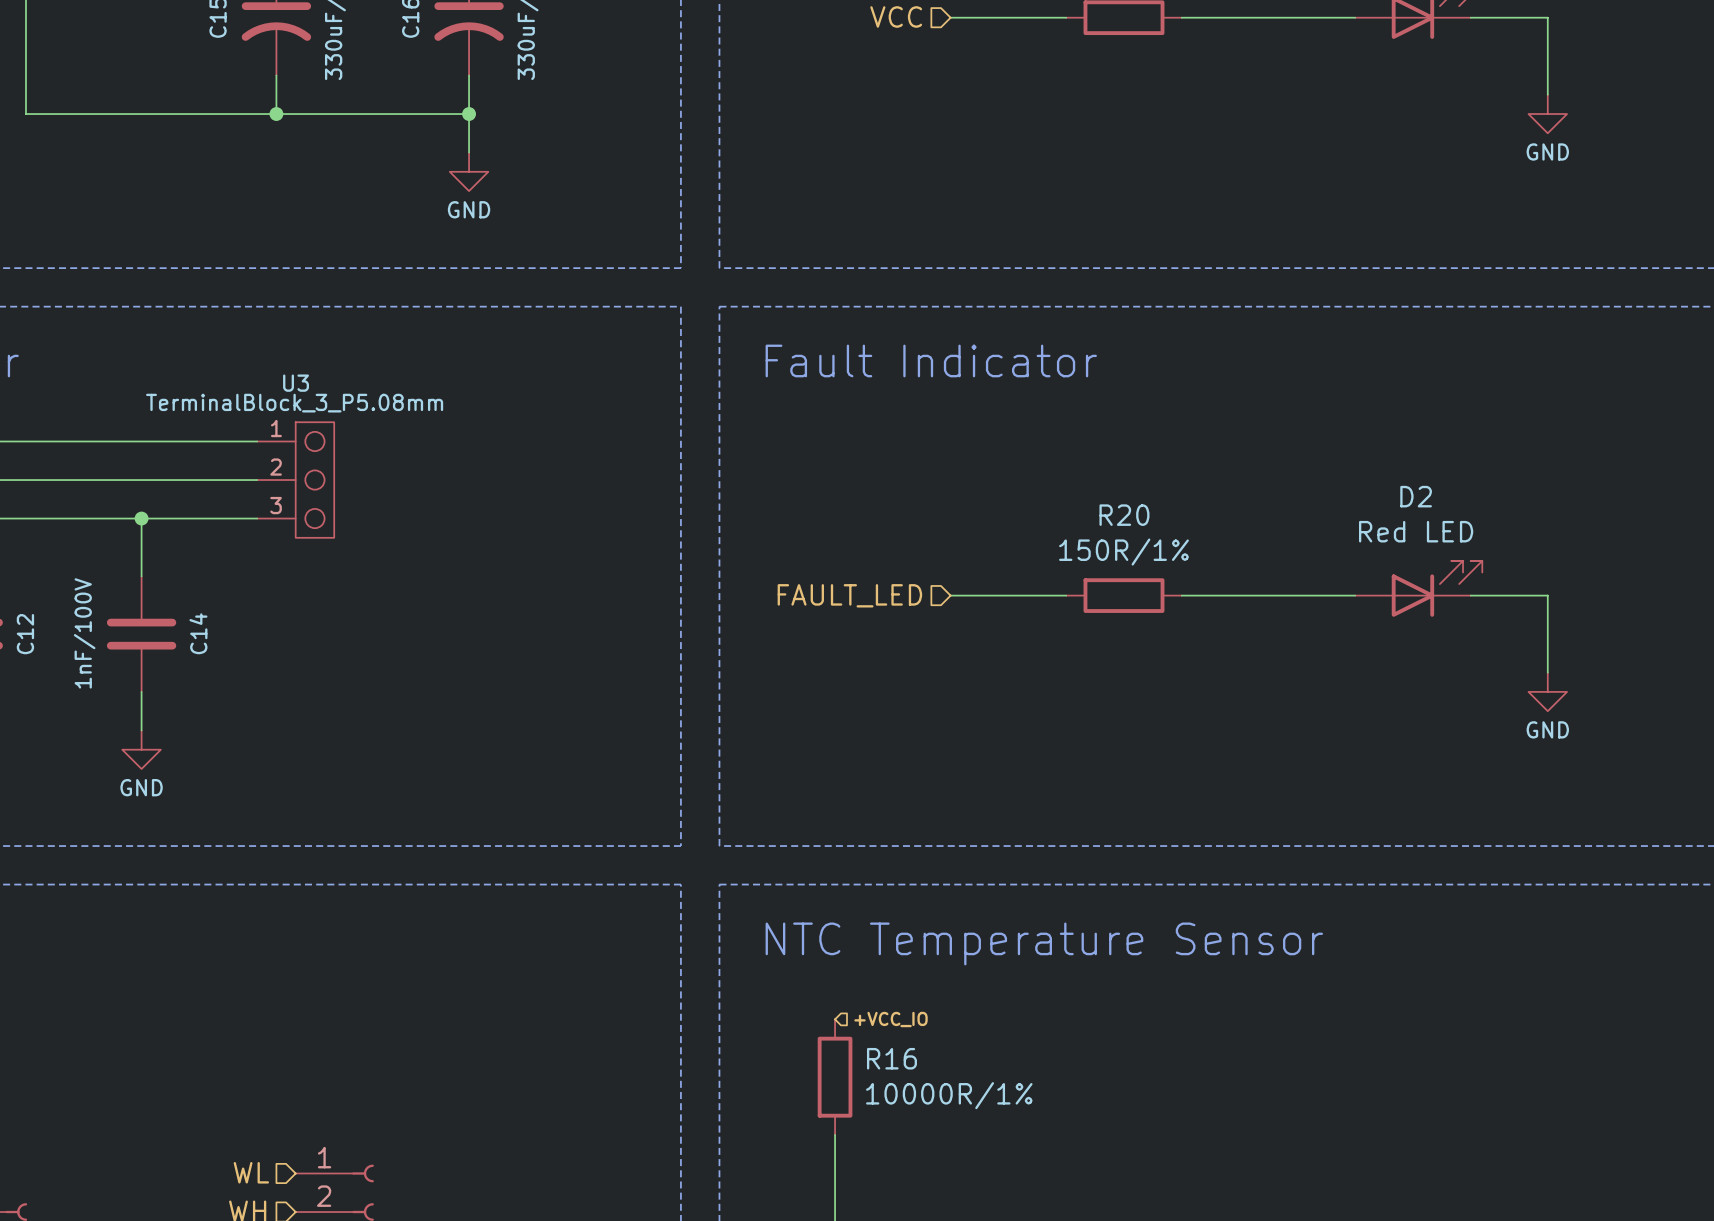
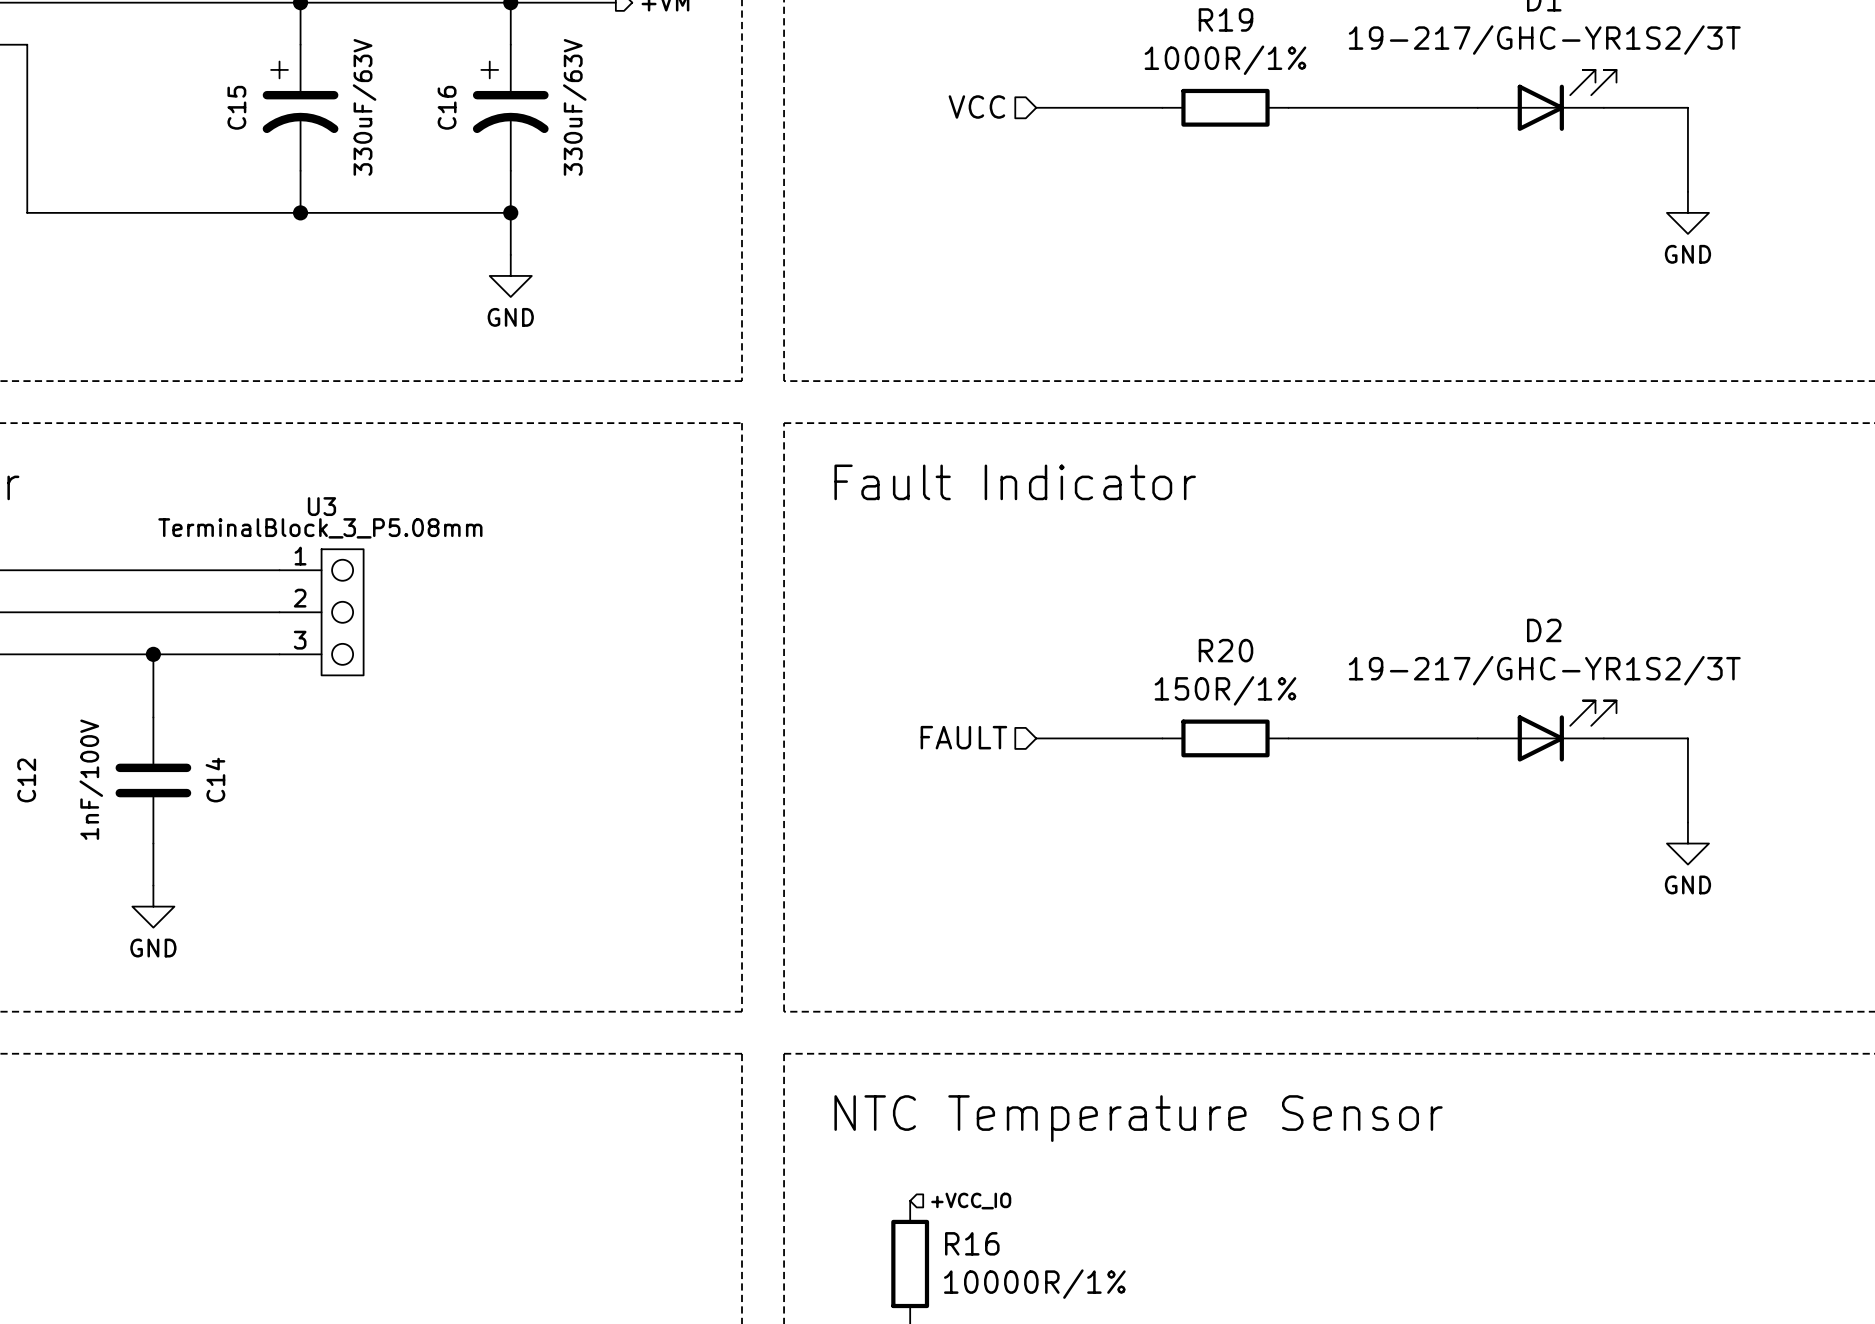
D2 value: Red LED (1416, 531) -> 19-217/GHC-YR1S2/3T (1544, 670)
hierarchical label: FAULT_LED (849, 595) -> FAULT (963, 737)

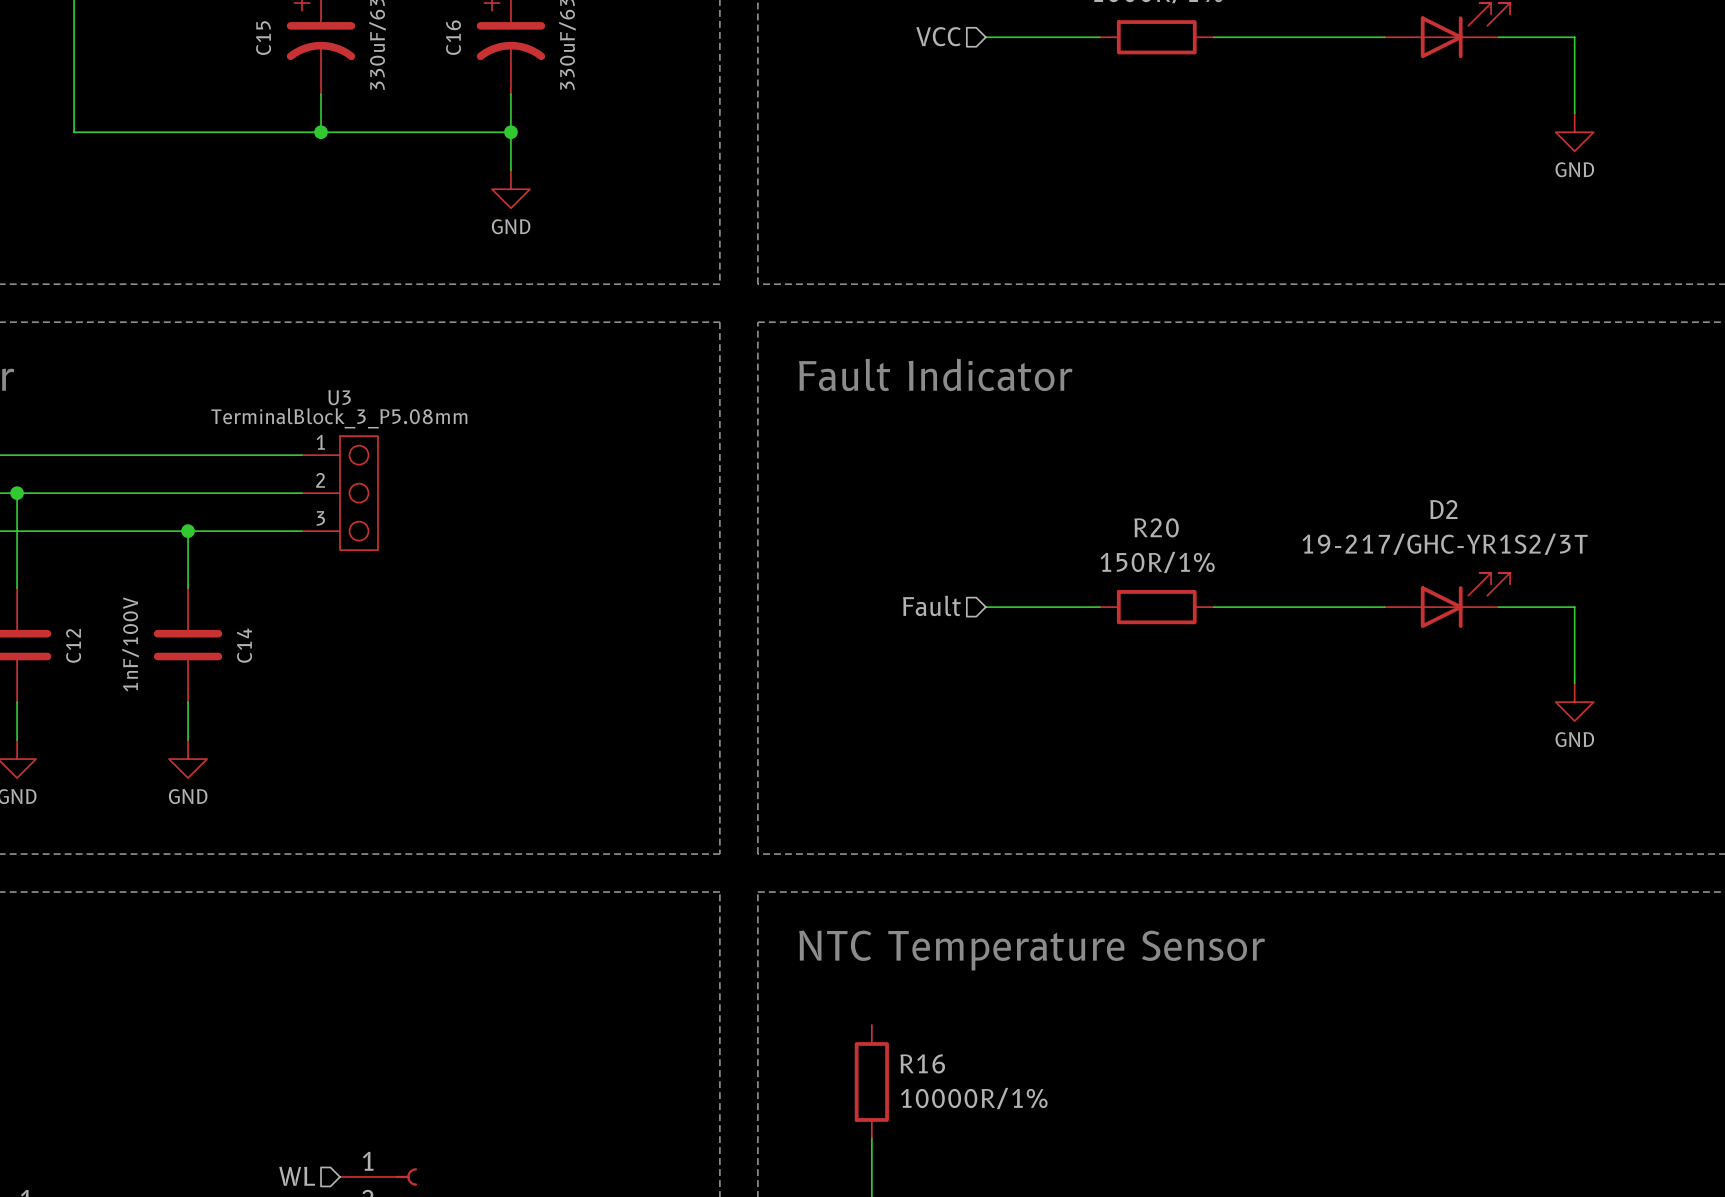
hierarchical label: FAULT (963, 737) -> Fault (931, 605)
hierarchical label: +VCC_IO (971, 1201) -> none

